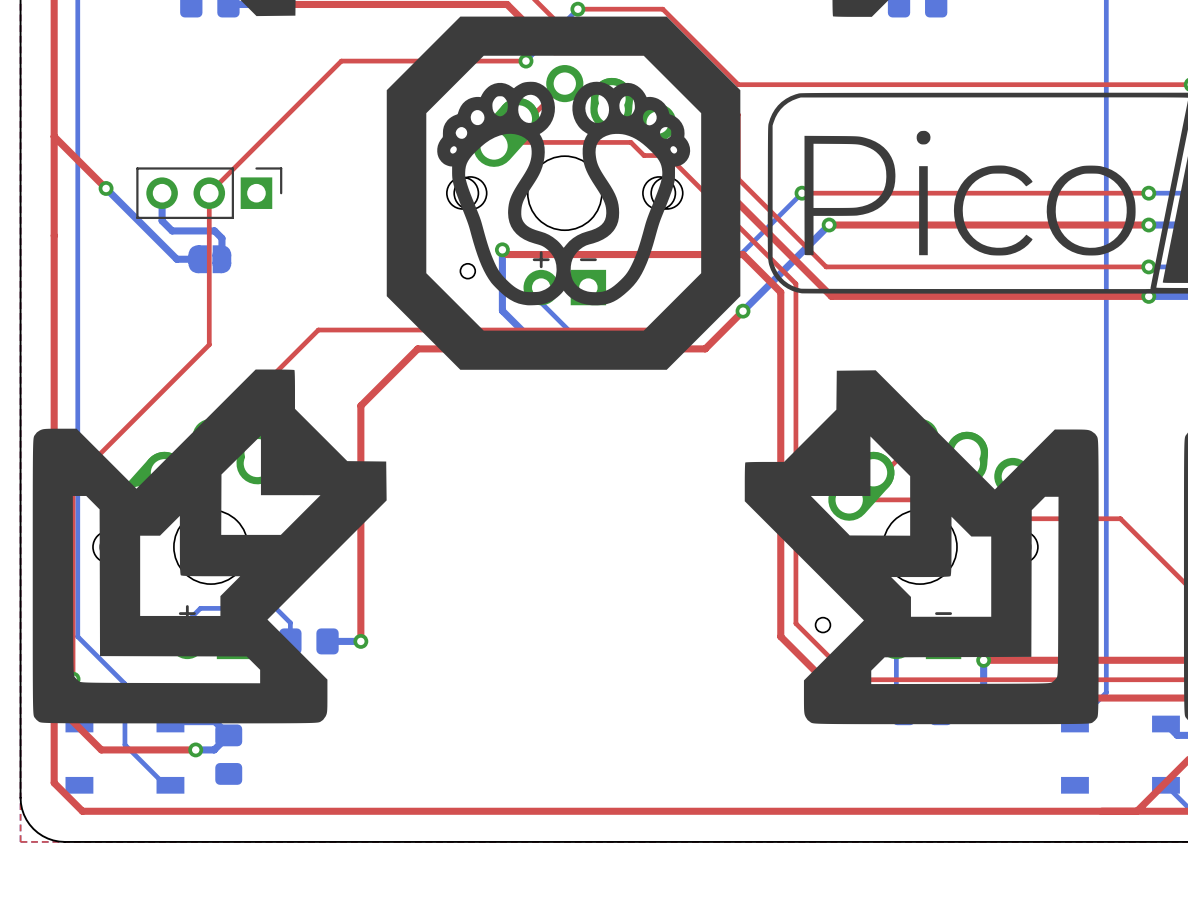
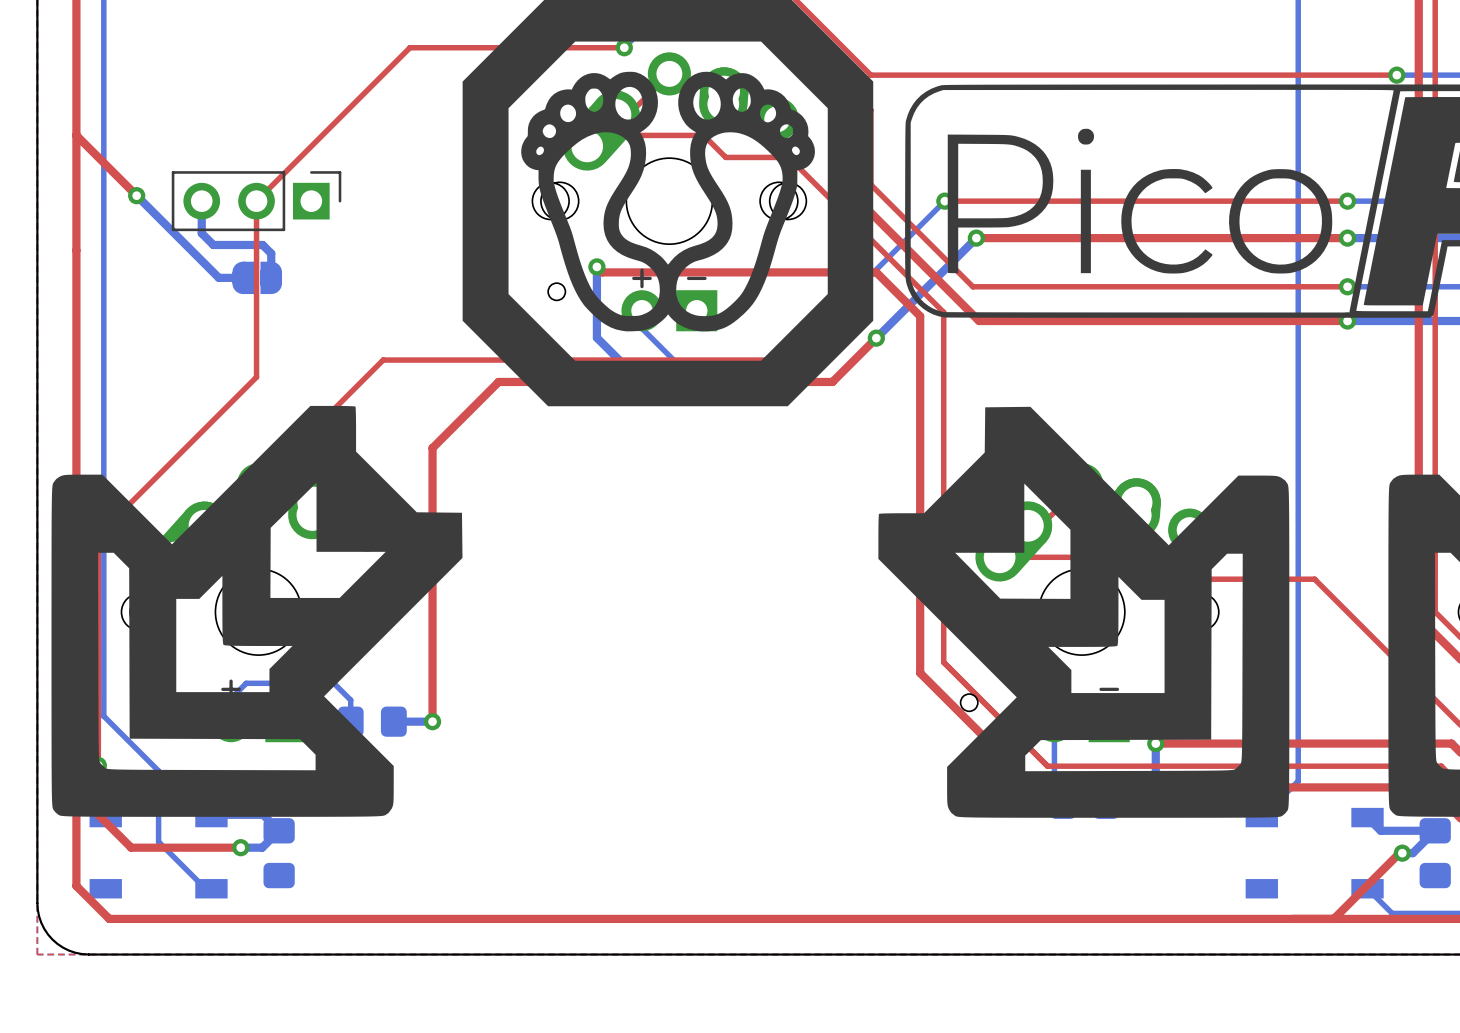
top track: (494, 142) (630, 142) (644, 155) -> (587, 142) (594, 135) (703, 135) (725, 157) (761, 157)
top track: (795, 283) (795, 623) (852, 679) (890, 679) -> (937, 306) (943, 312) (943, 662) (1047, 766)
top track: (780, 599) (780, 636) (842, 698) (879, 698) -> (920, 673) (1034, 787)

